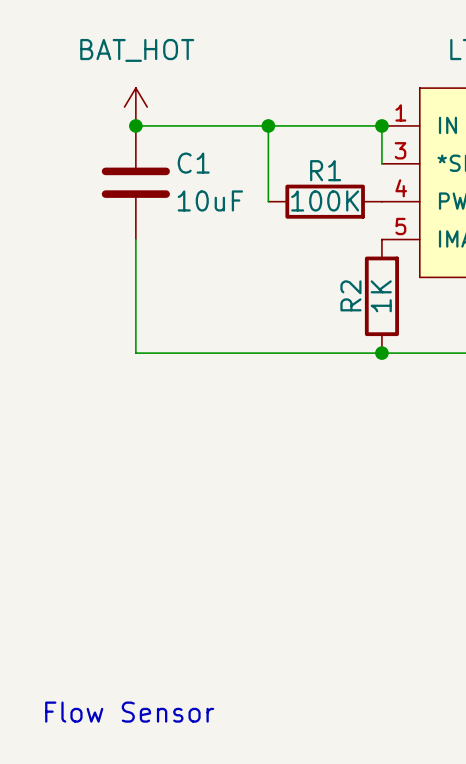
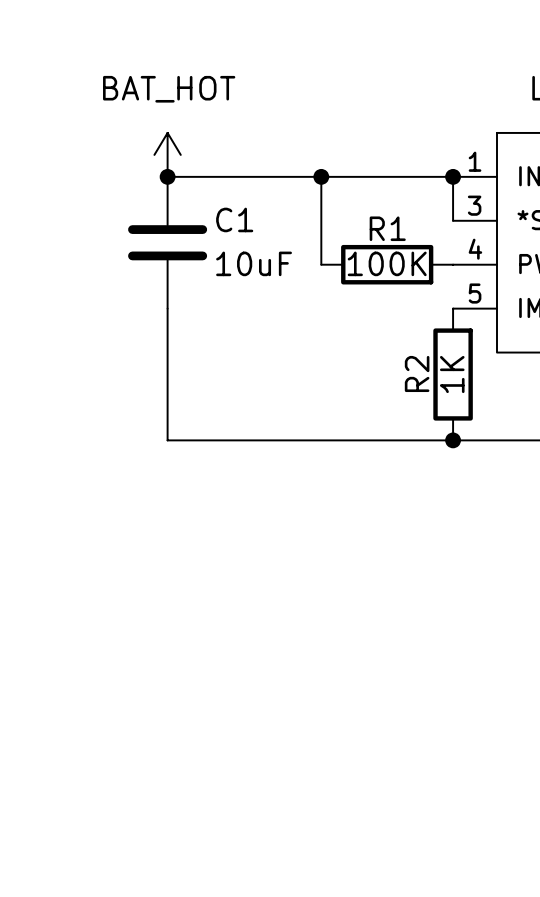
text: Flow Sensor (129, 712) -> none

